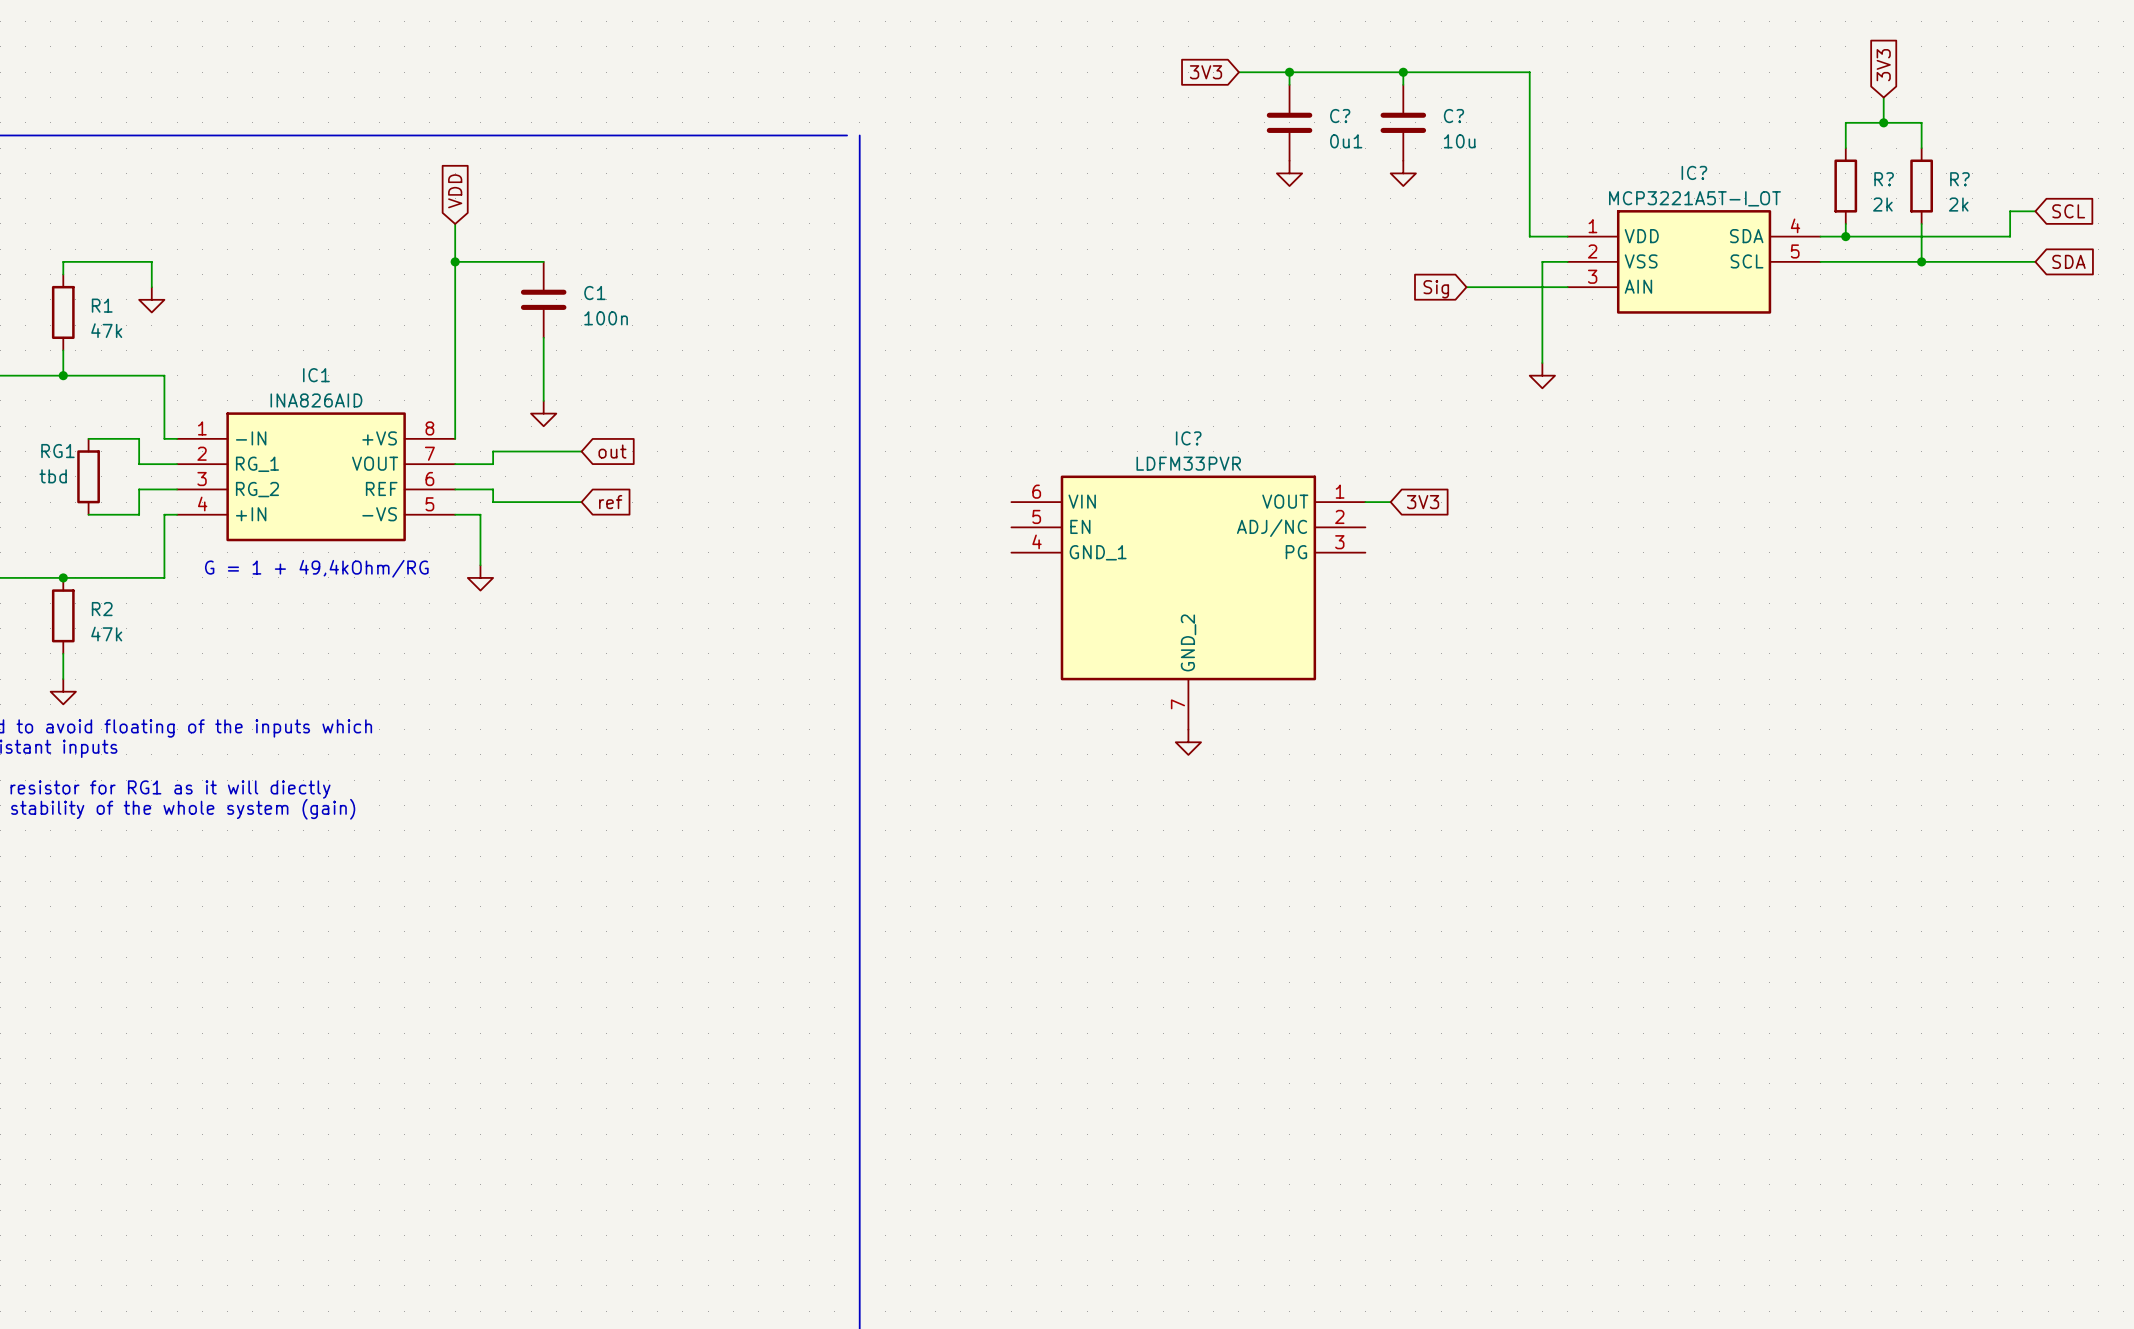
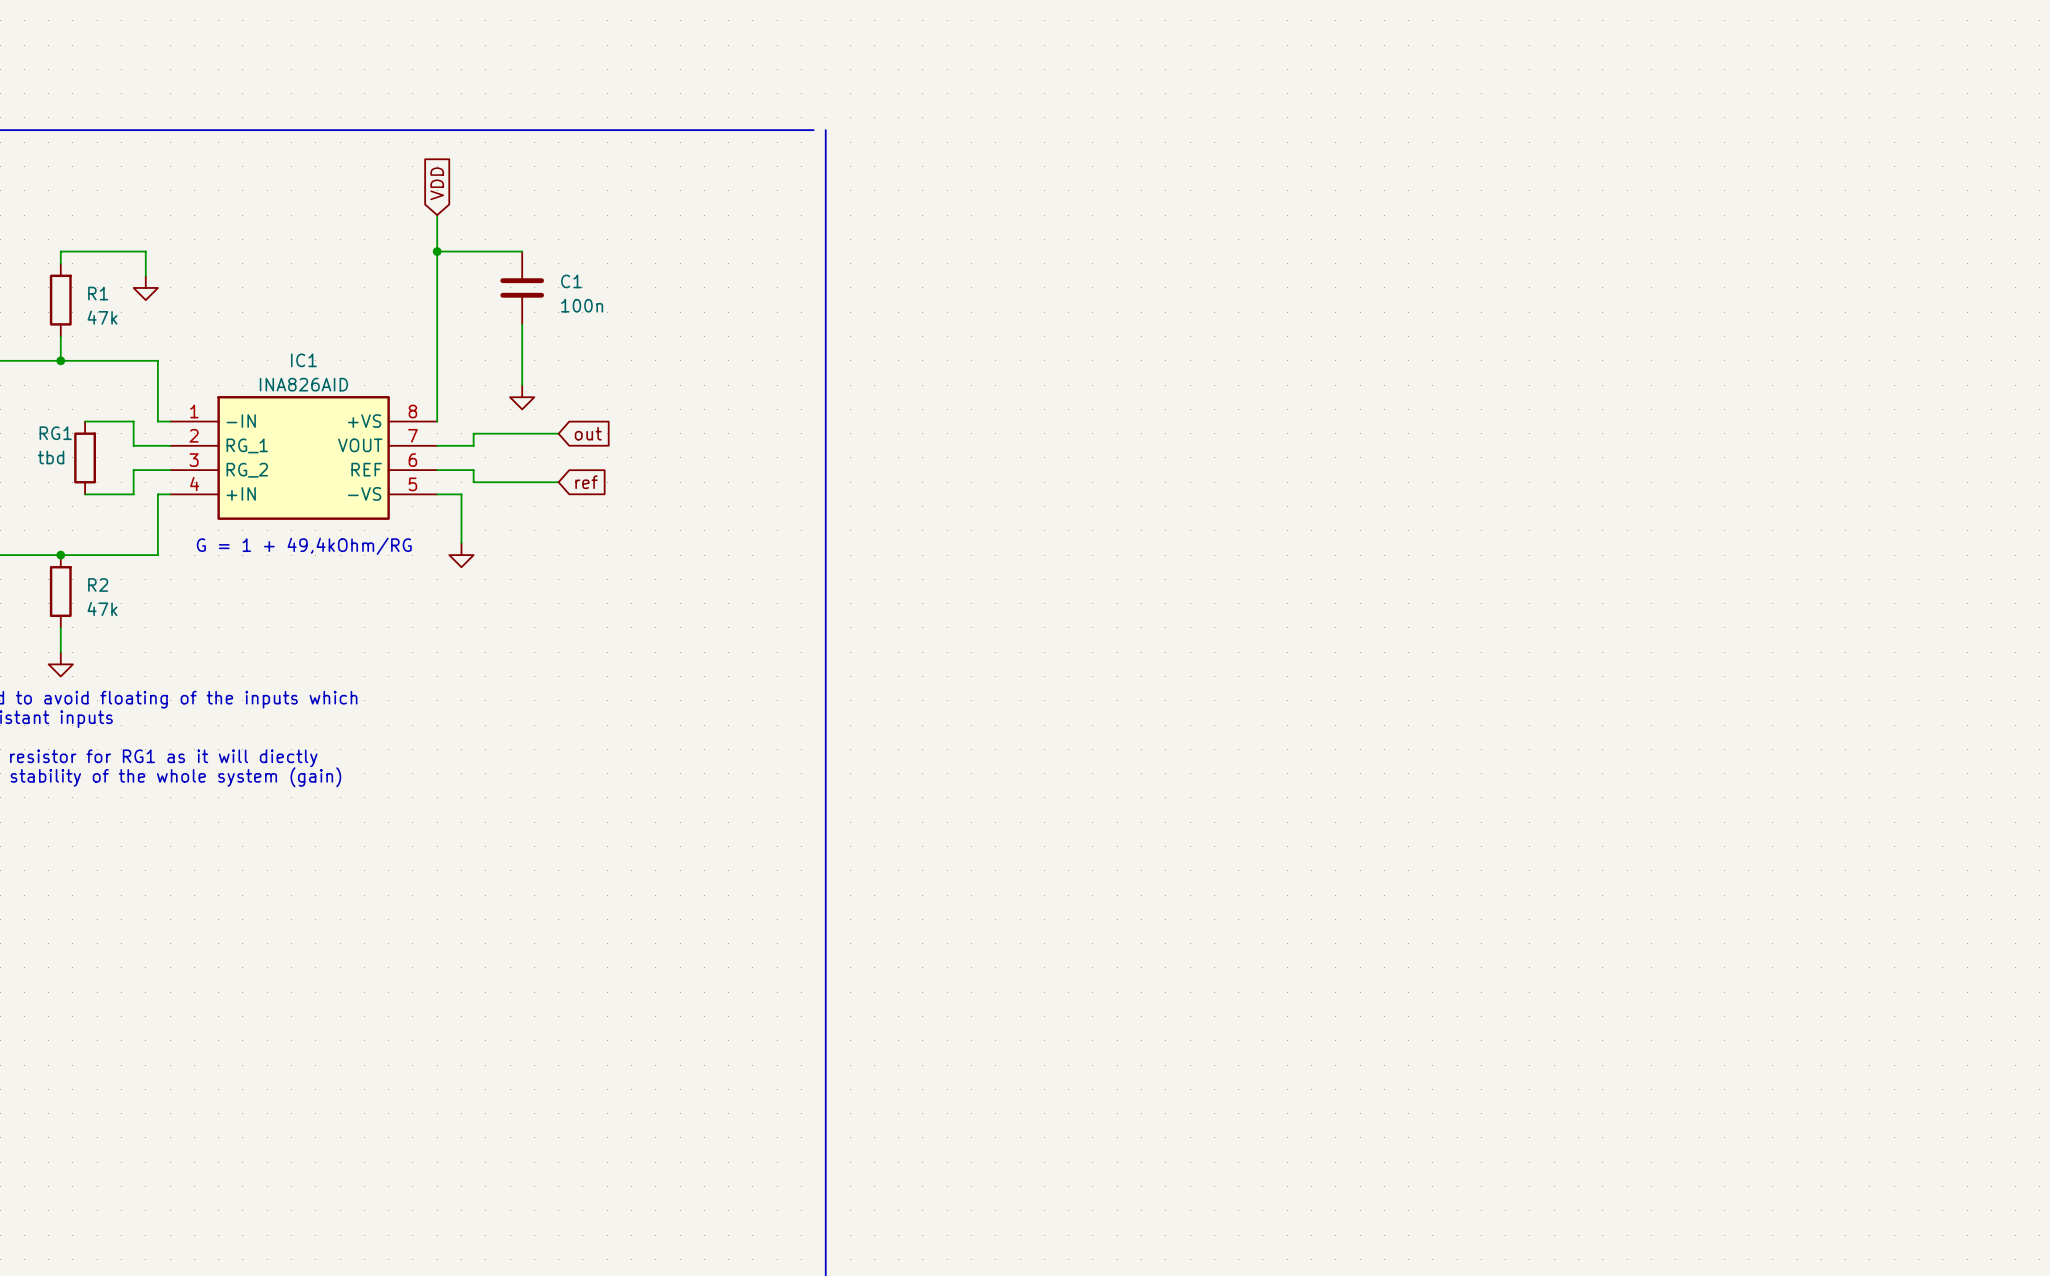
global label: 3V3 (1883, 65) -> none
global label: 3V3 (1205, 72) -> none
wire: (1238, 72) (1529, 72) (1529, 236) (1567, 236) -> none
wire: (1289, 72) (1289, 84) -> none
junction: (1289, 72) -> none
wire: (1403, 72) (1403, 84) -> none
junction: (1403, 72) -> none
wire: (1883, 97) (1883, 122) -> none
C?: 0u1 (1289, 122) -> none
C?: 10u (1403, 122) -> none
junction: (1883, 122) -> none
wire: (1845, 148) (1845, 122) (1921, 122) (1921, 148) -> none
power symbol: (1289, 173) -> none
power symbol: (1403, 173) -> none
R?: 2k (1845, 186) -> none
R?: 2k (1921, 186) -> none
wire: (2035, 211) (2010, 211) (2010, 236) (1820, 236) -> none
global label: SCL (2068, 211) -> none
wire: (1845, 223) (1845, 236) -> none
wire: (1921, 223) (1921, 261) -> none
junction: (1845, 236) -> none
wire: (1567, 261) (1542, 261) (1542, 363) -> none
IC?: MCP3221A5T-I_OT (1694, 261) -> none
wire: (1820, 261) (2035, 261) -> none
junction: (1921, 261) -> none
global label: SDA (2068, 261) -> none
wire: (1466, 287) (1567, 287) -> none
global label: Sig (1436, 289) -> none
power symbol: (1542, 375) -> none
wire: (1365, 502) (1390, 502) -> none
global label: 3V3 (1423, 502) -> none
IC?: LDFM33PVR (1188, 602) -> none
power symbol: (1188, 742) -> none

